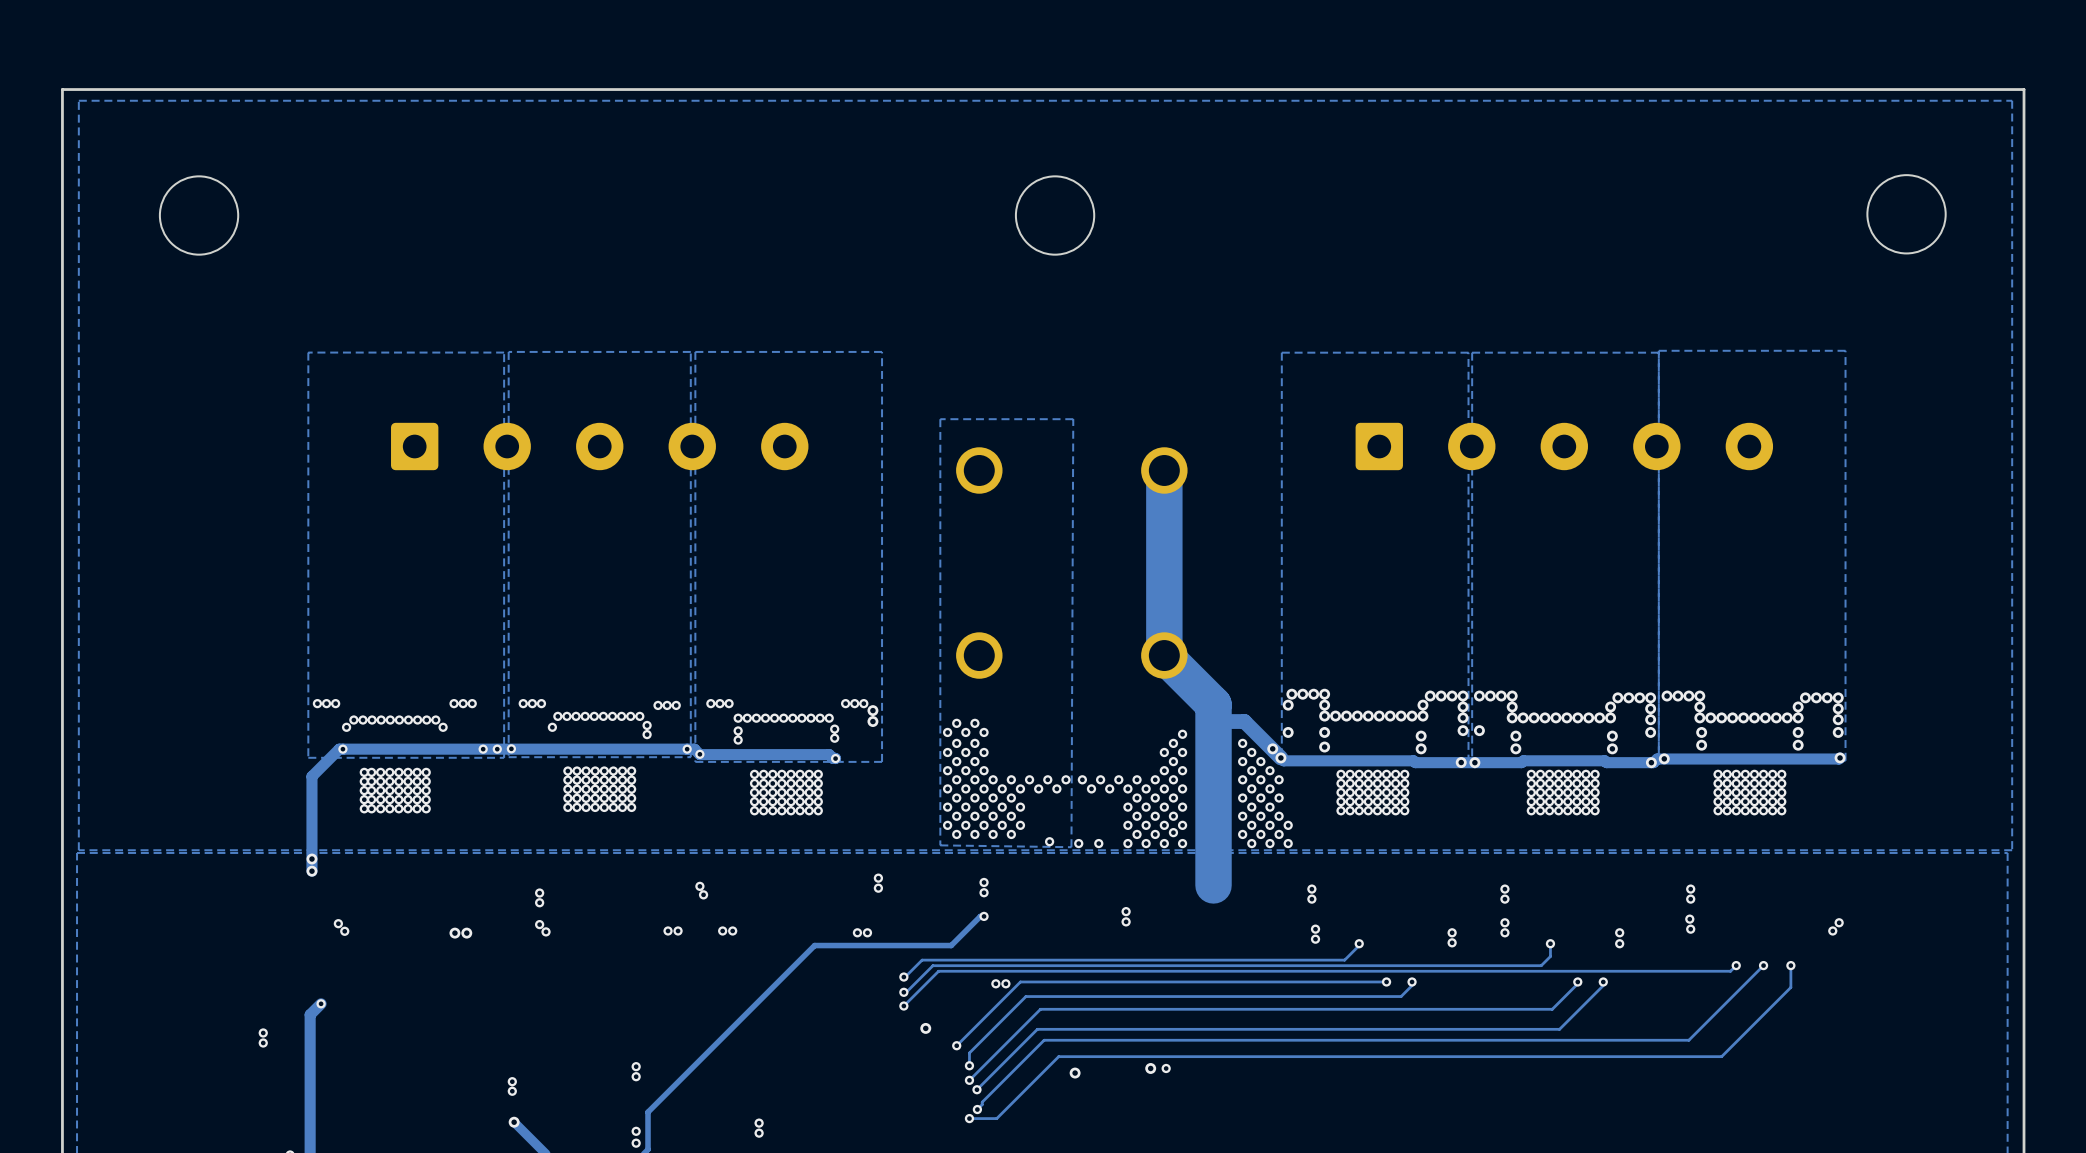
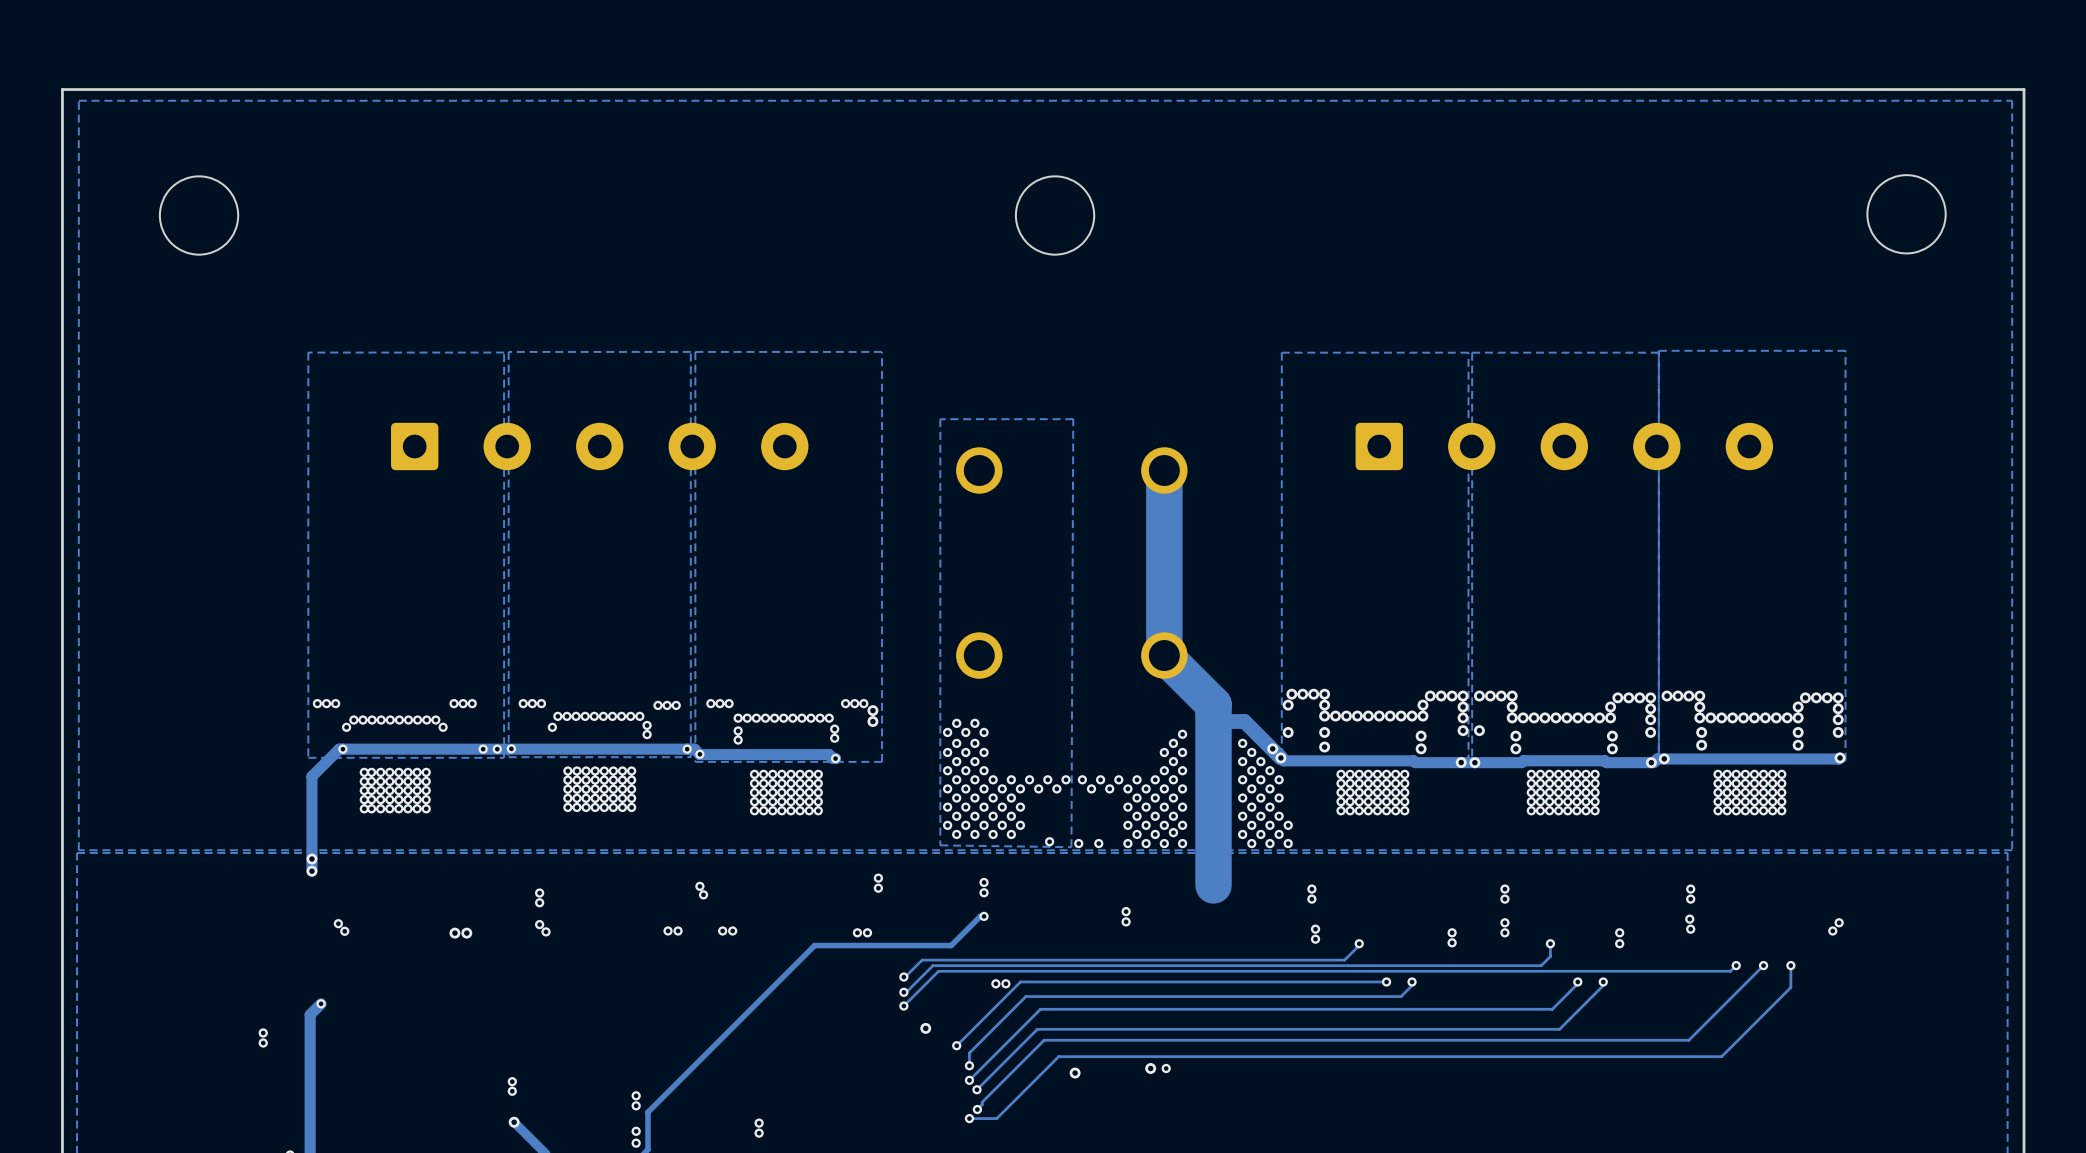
via: (636, 1066) -> none
via: (636, 1076) -> none
via: none -> (636, 1095)
via: none -> (636, 1105)

